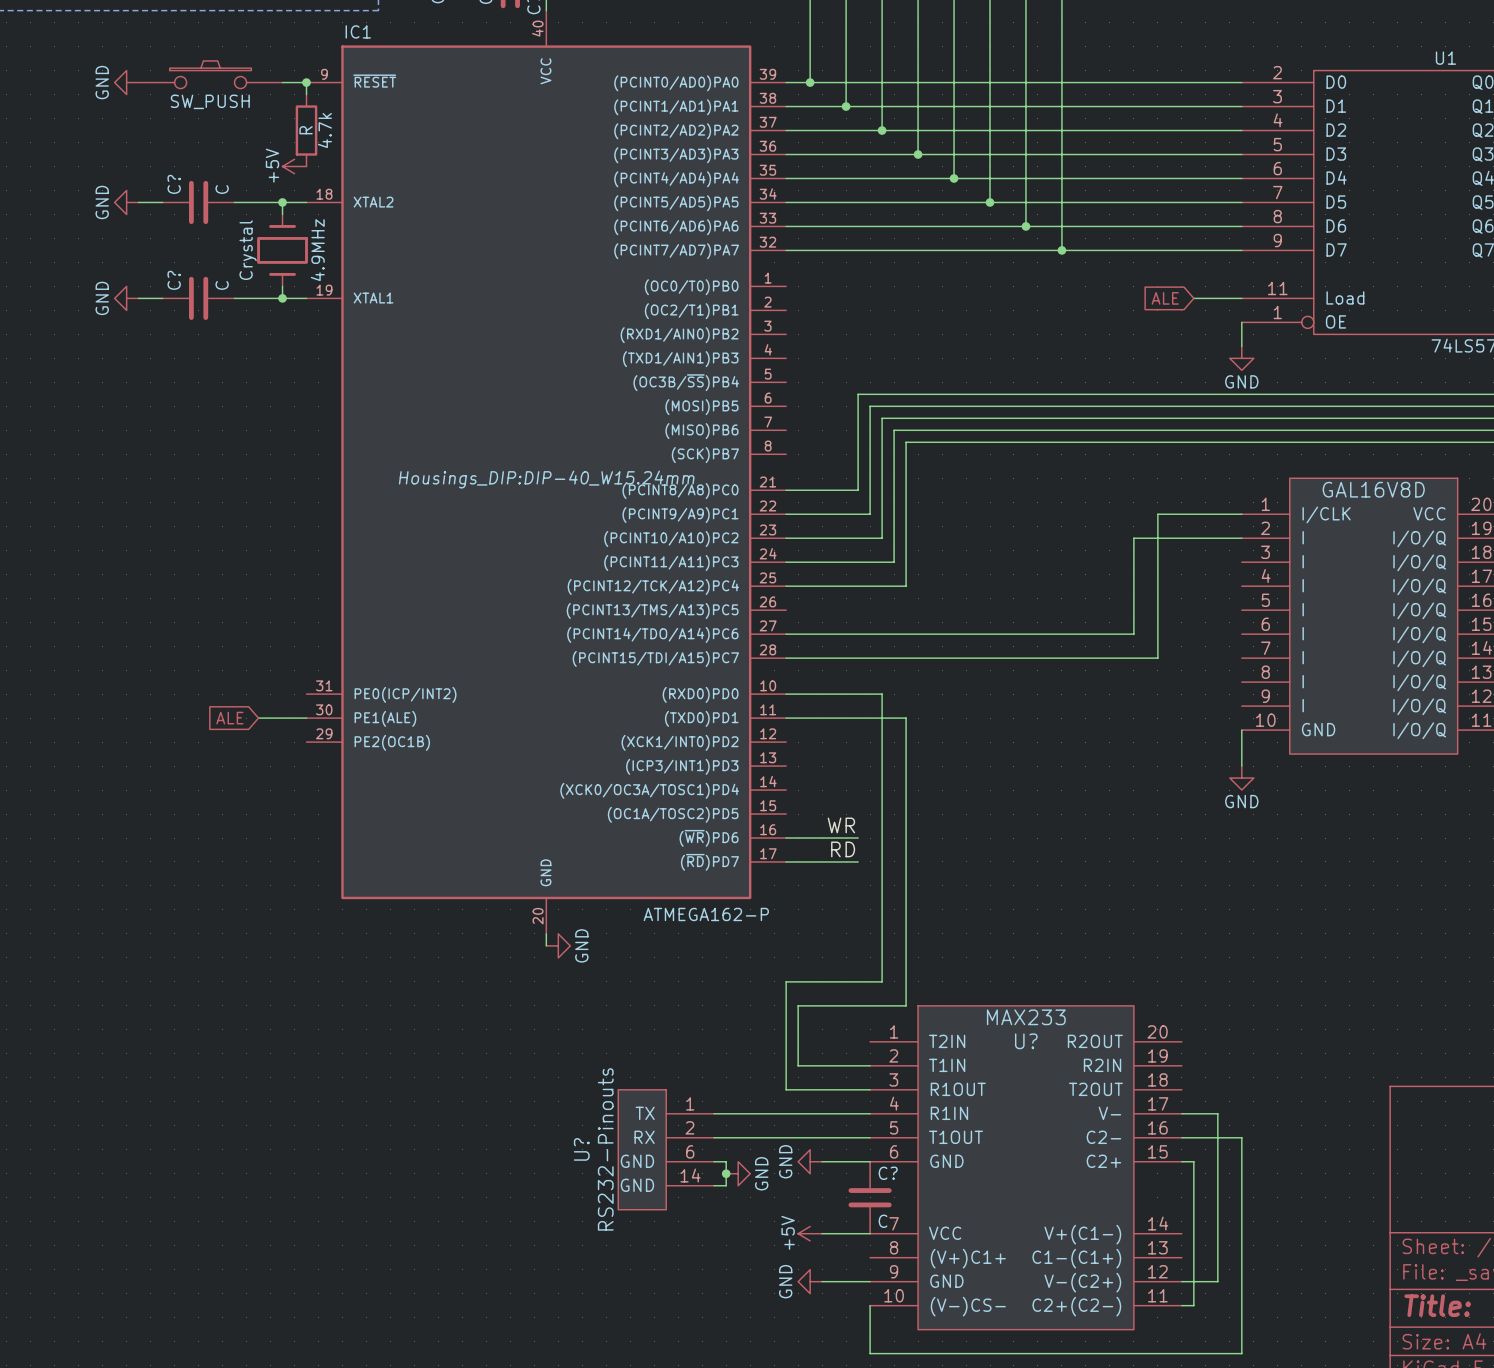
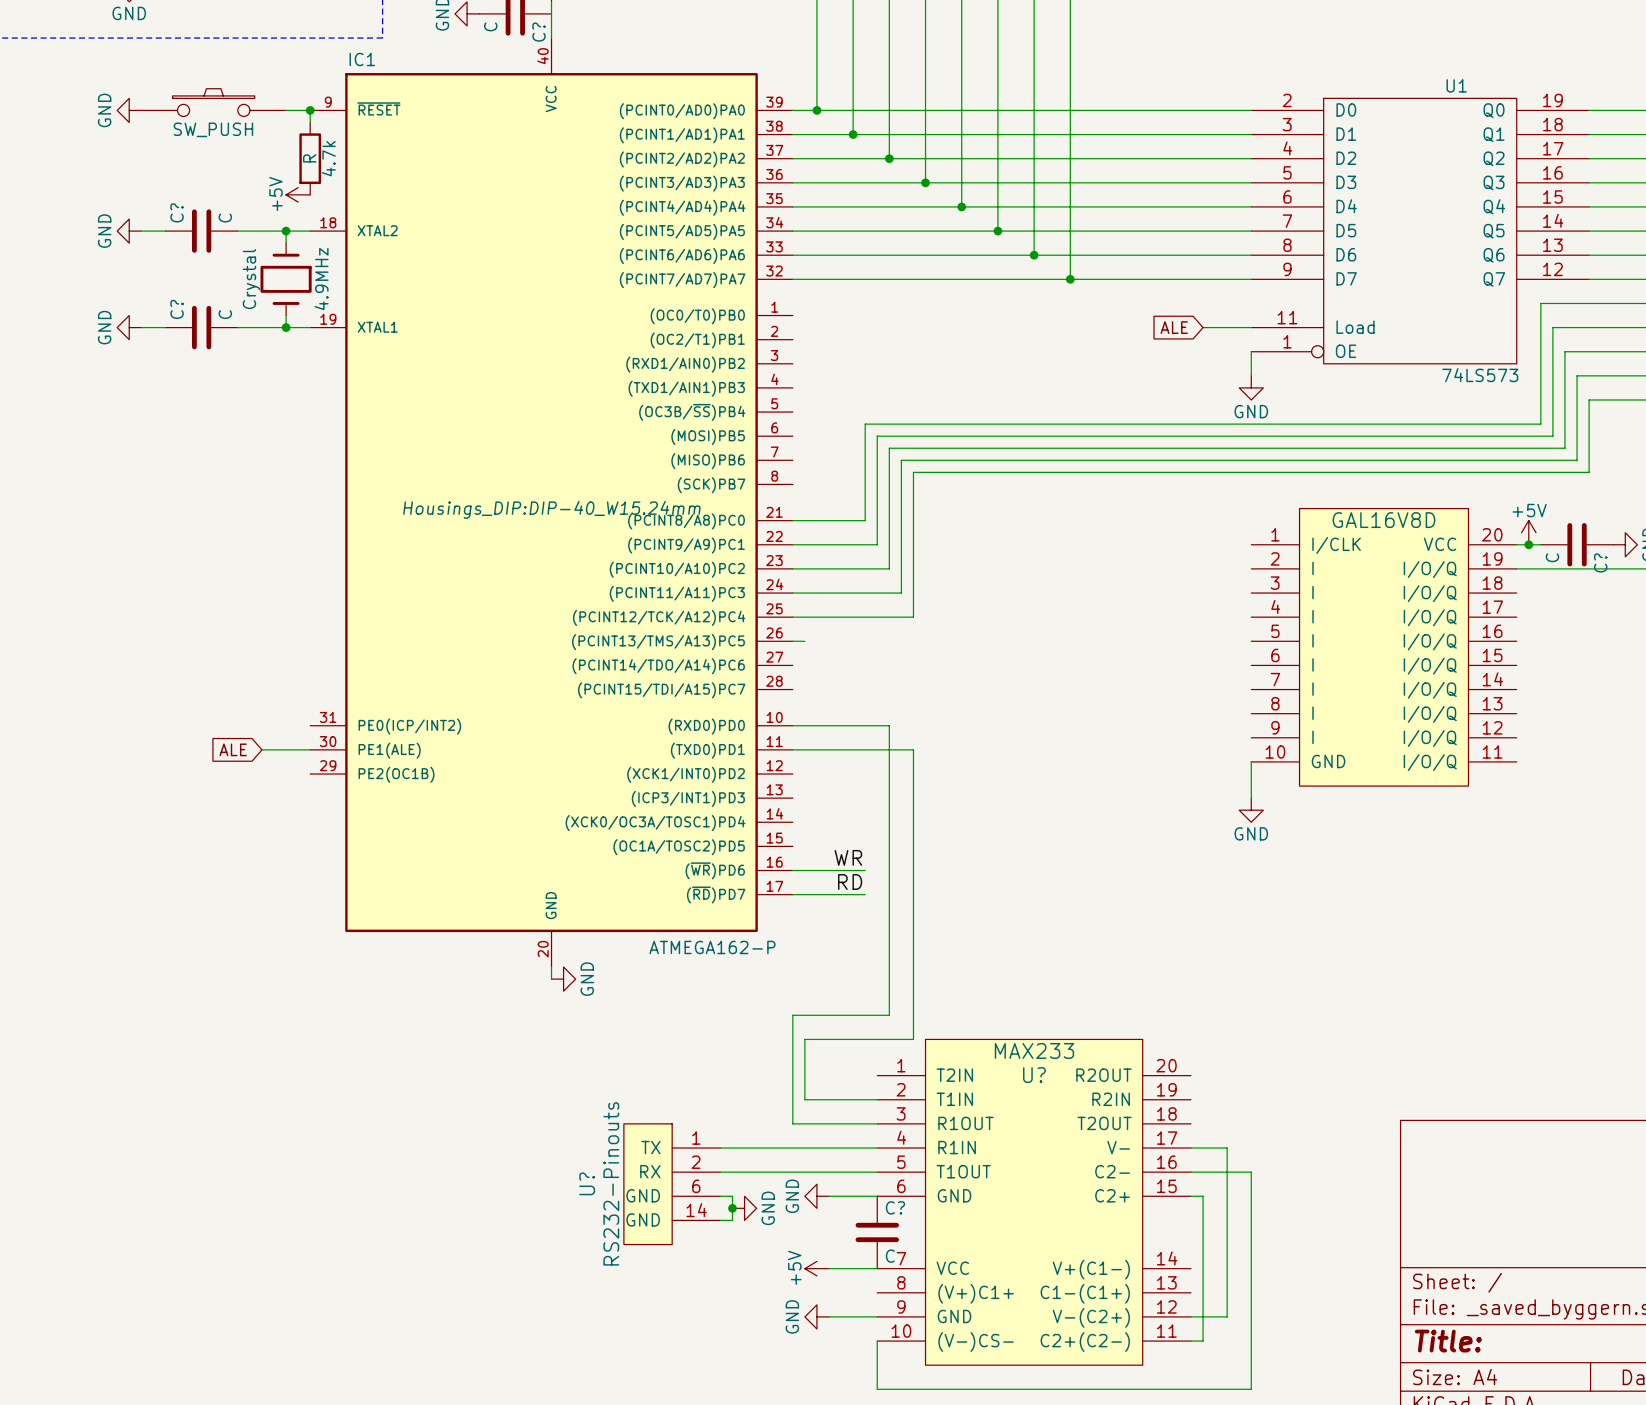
wire: (1241, 514) (1157, 514) (1157, 658) (786, 658) -> none
wire: (1241, 538) (1133, 538) (1133, 634) (786, 634) -> none
wire: none -> (792, 641) (804, 641)

